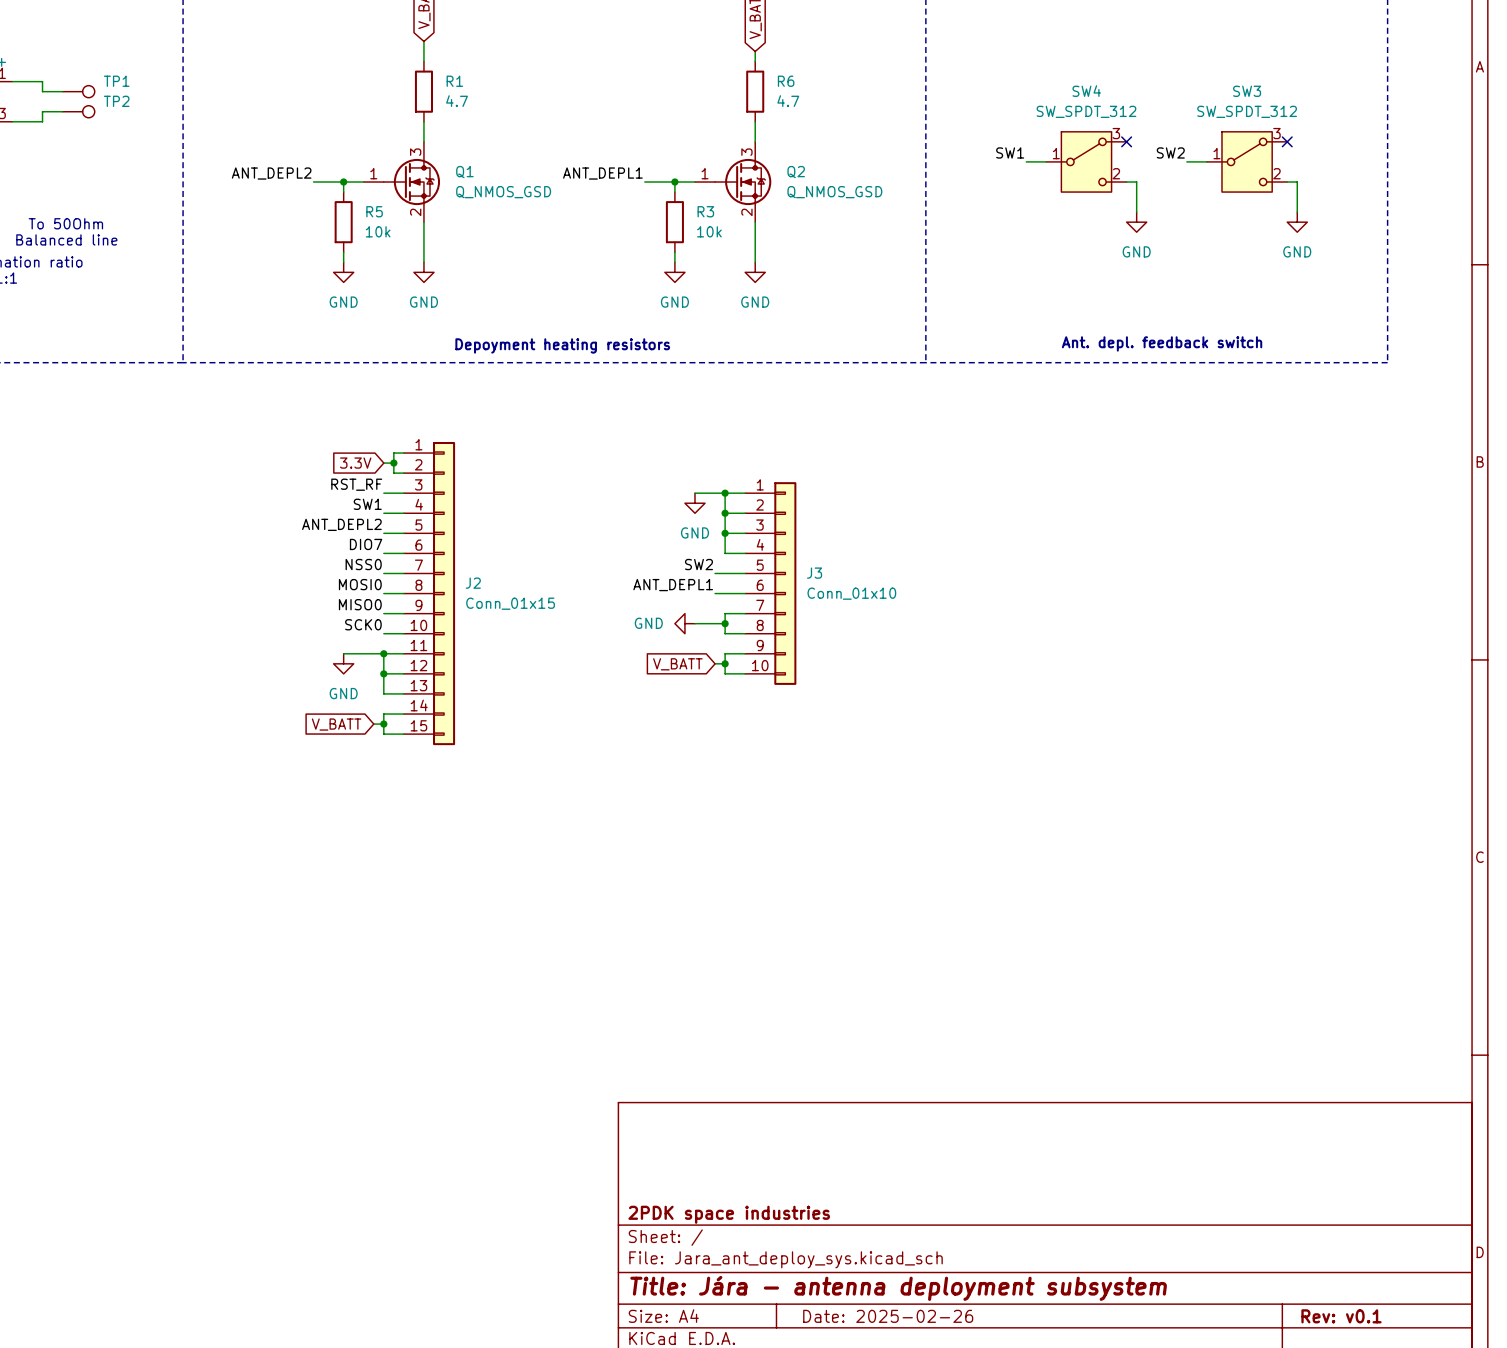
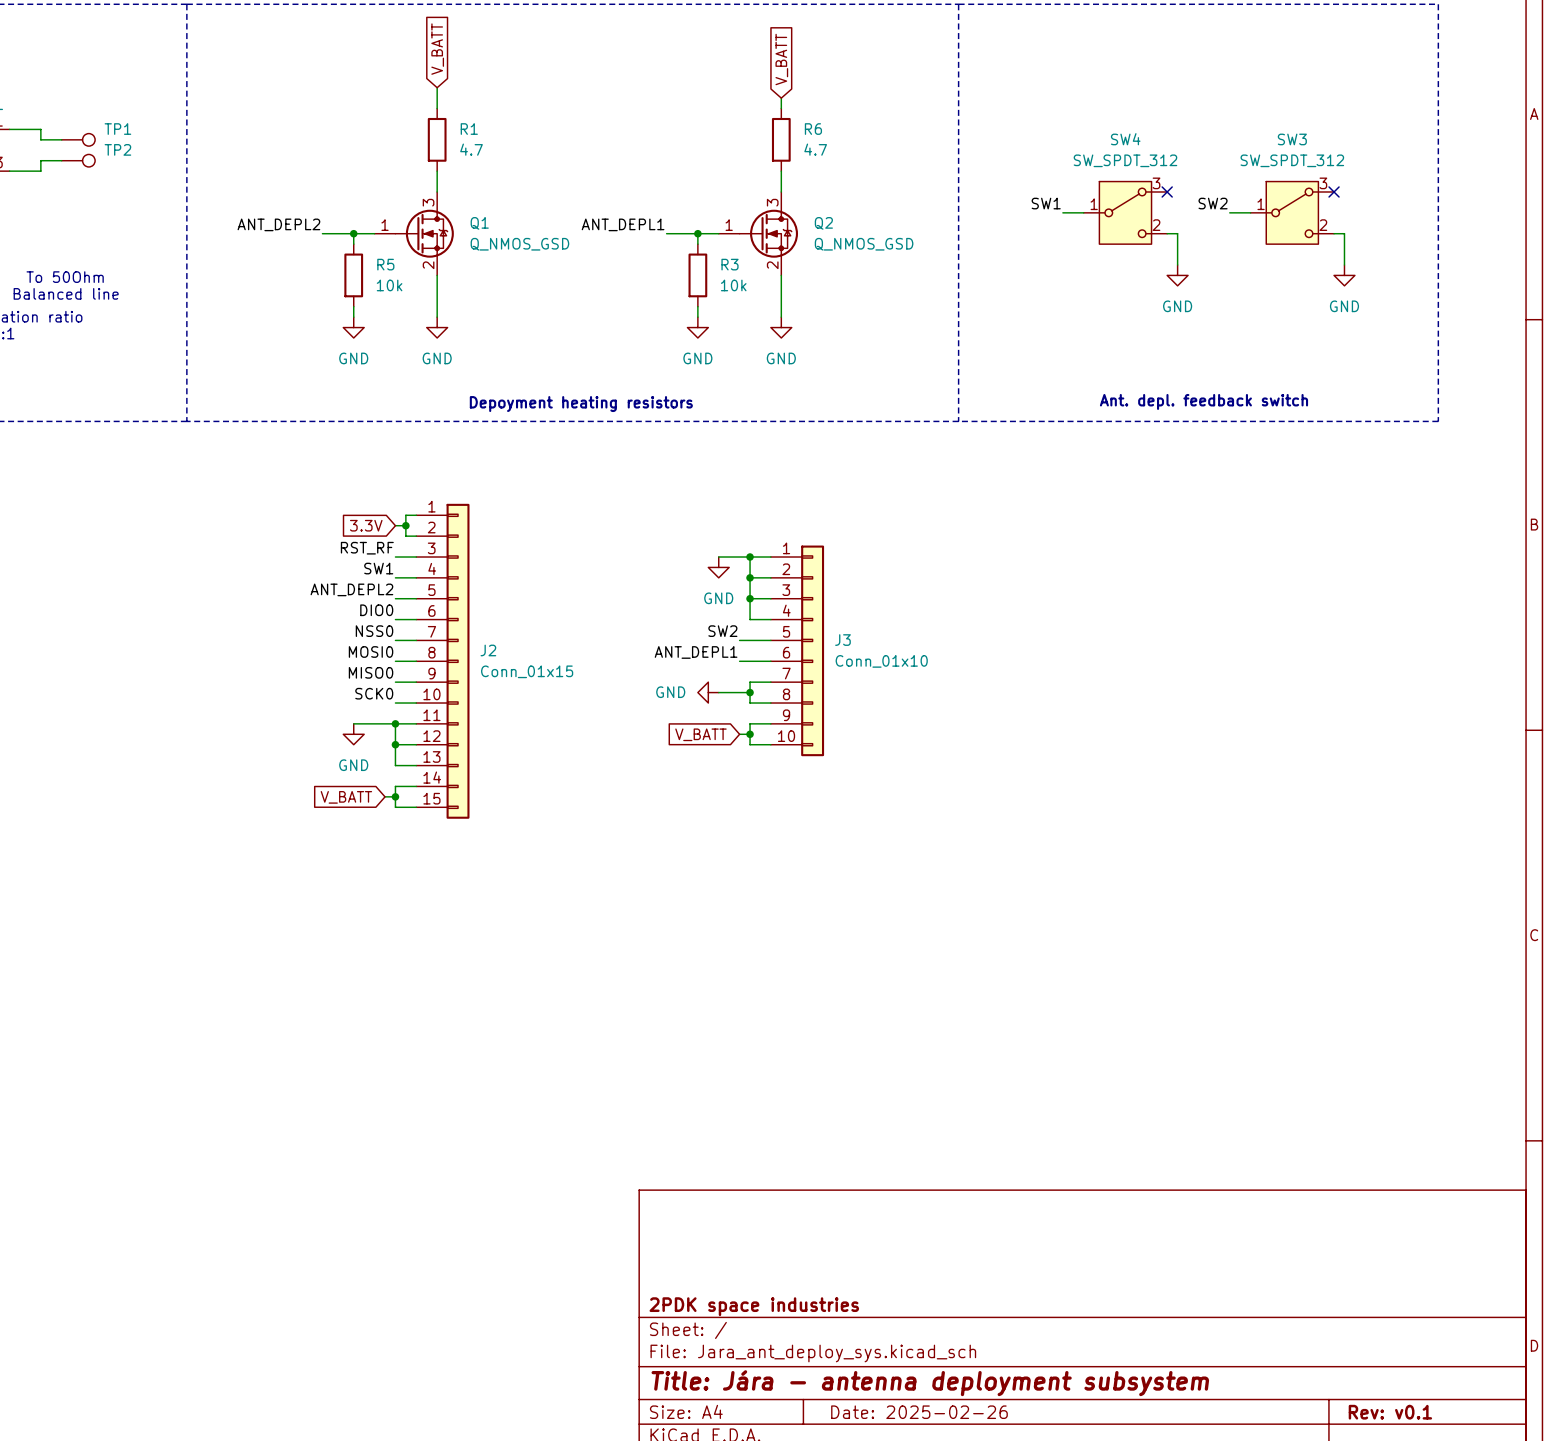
label: DIO7 (366, 544) -> DIO0 (376, 610)

